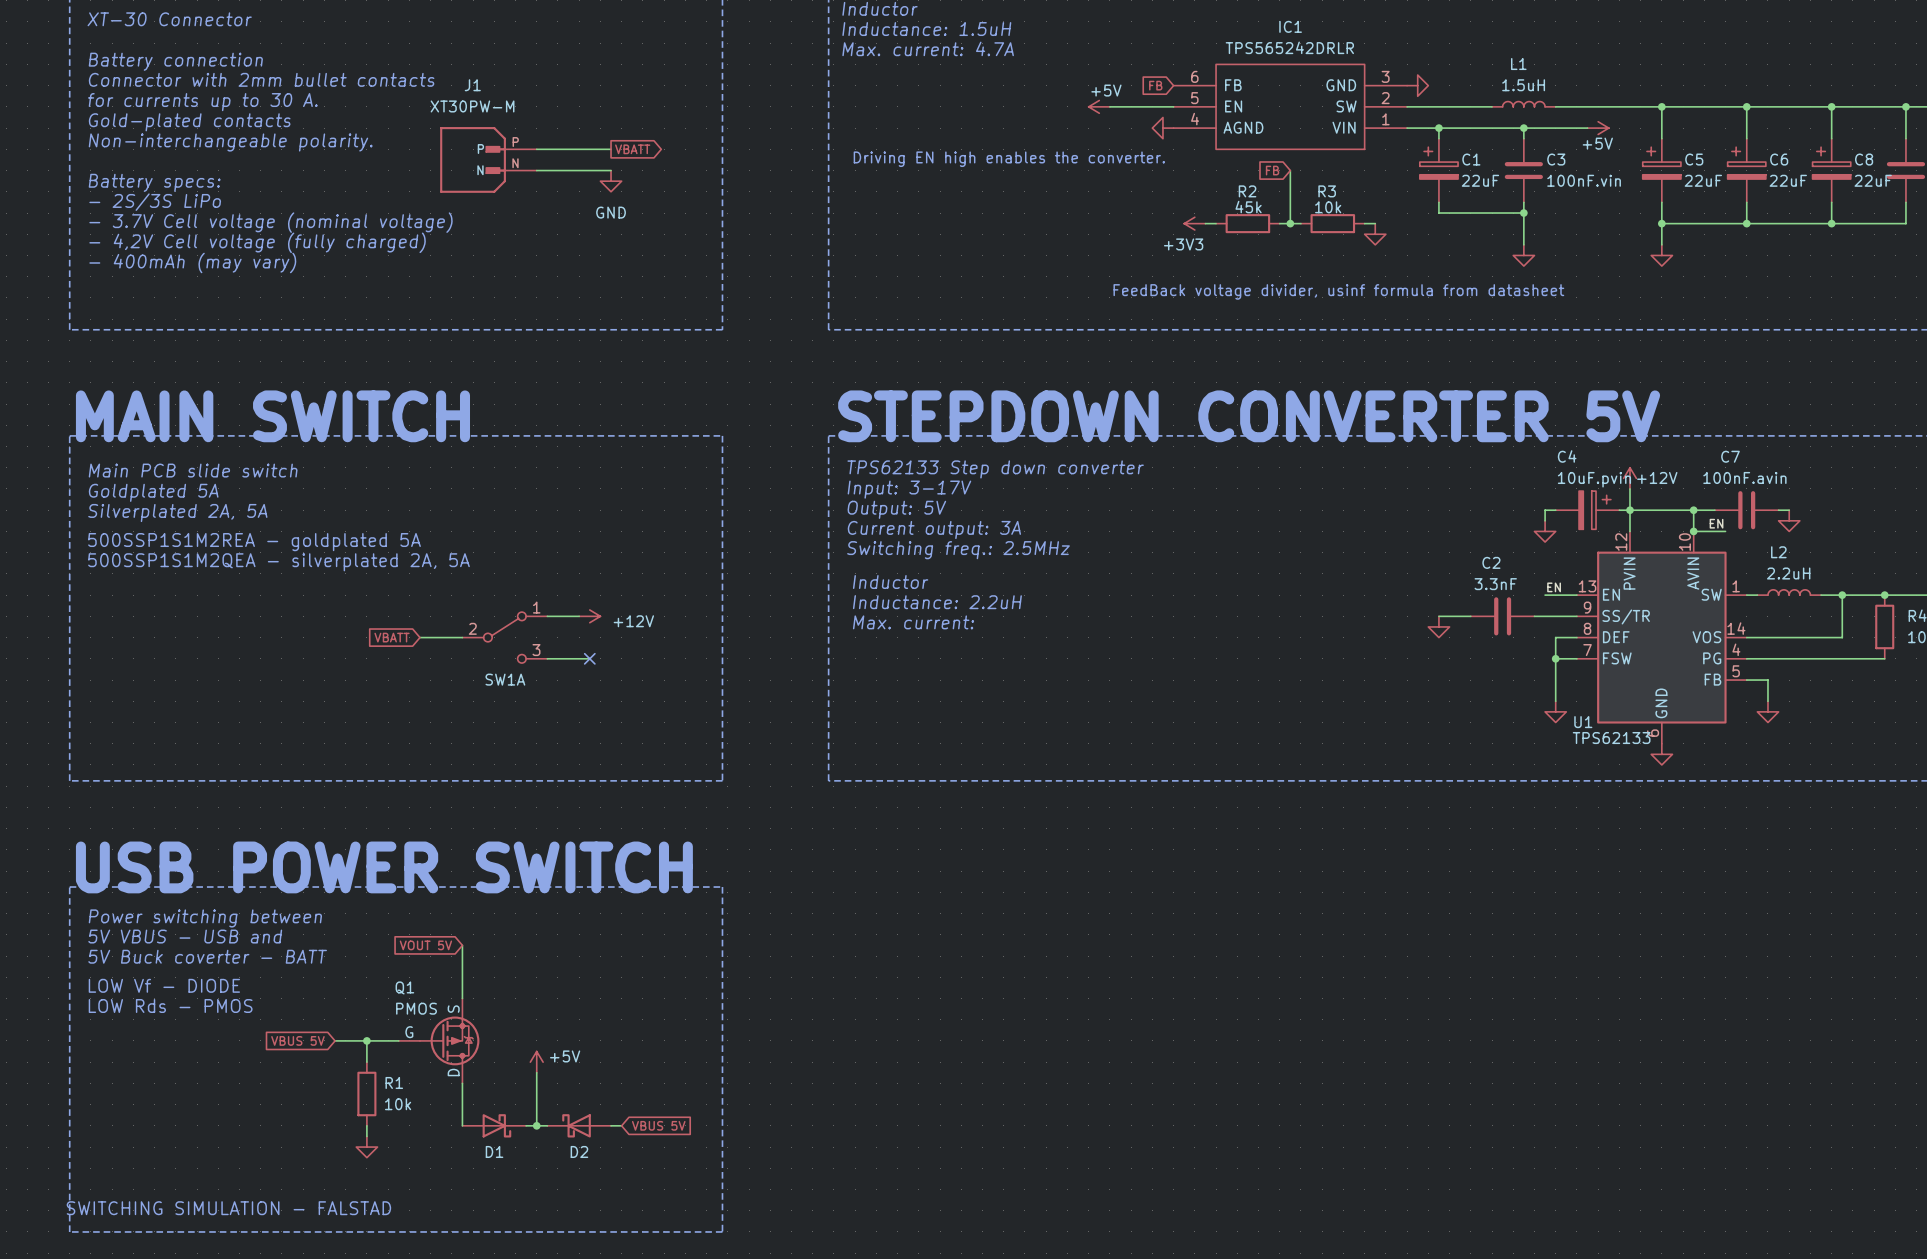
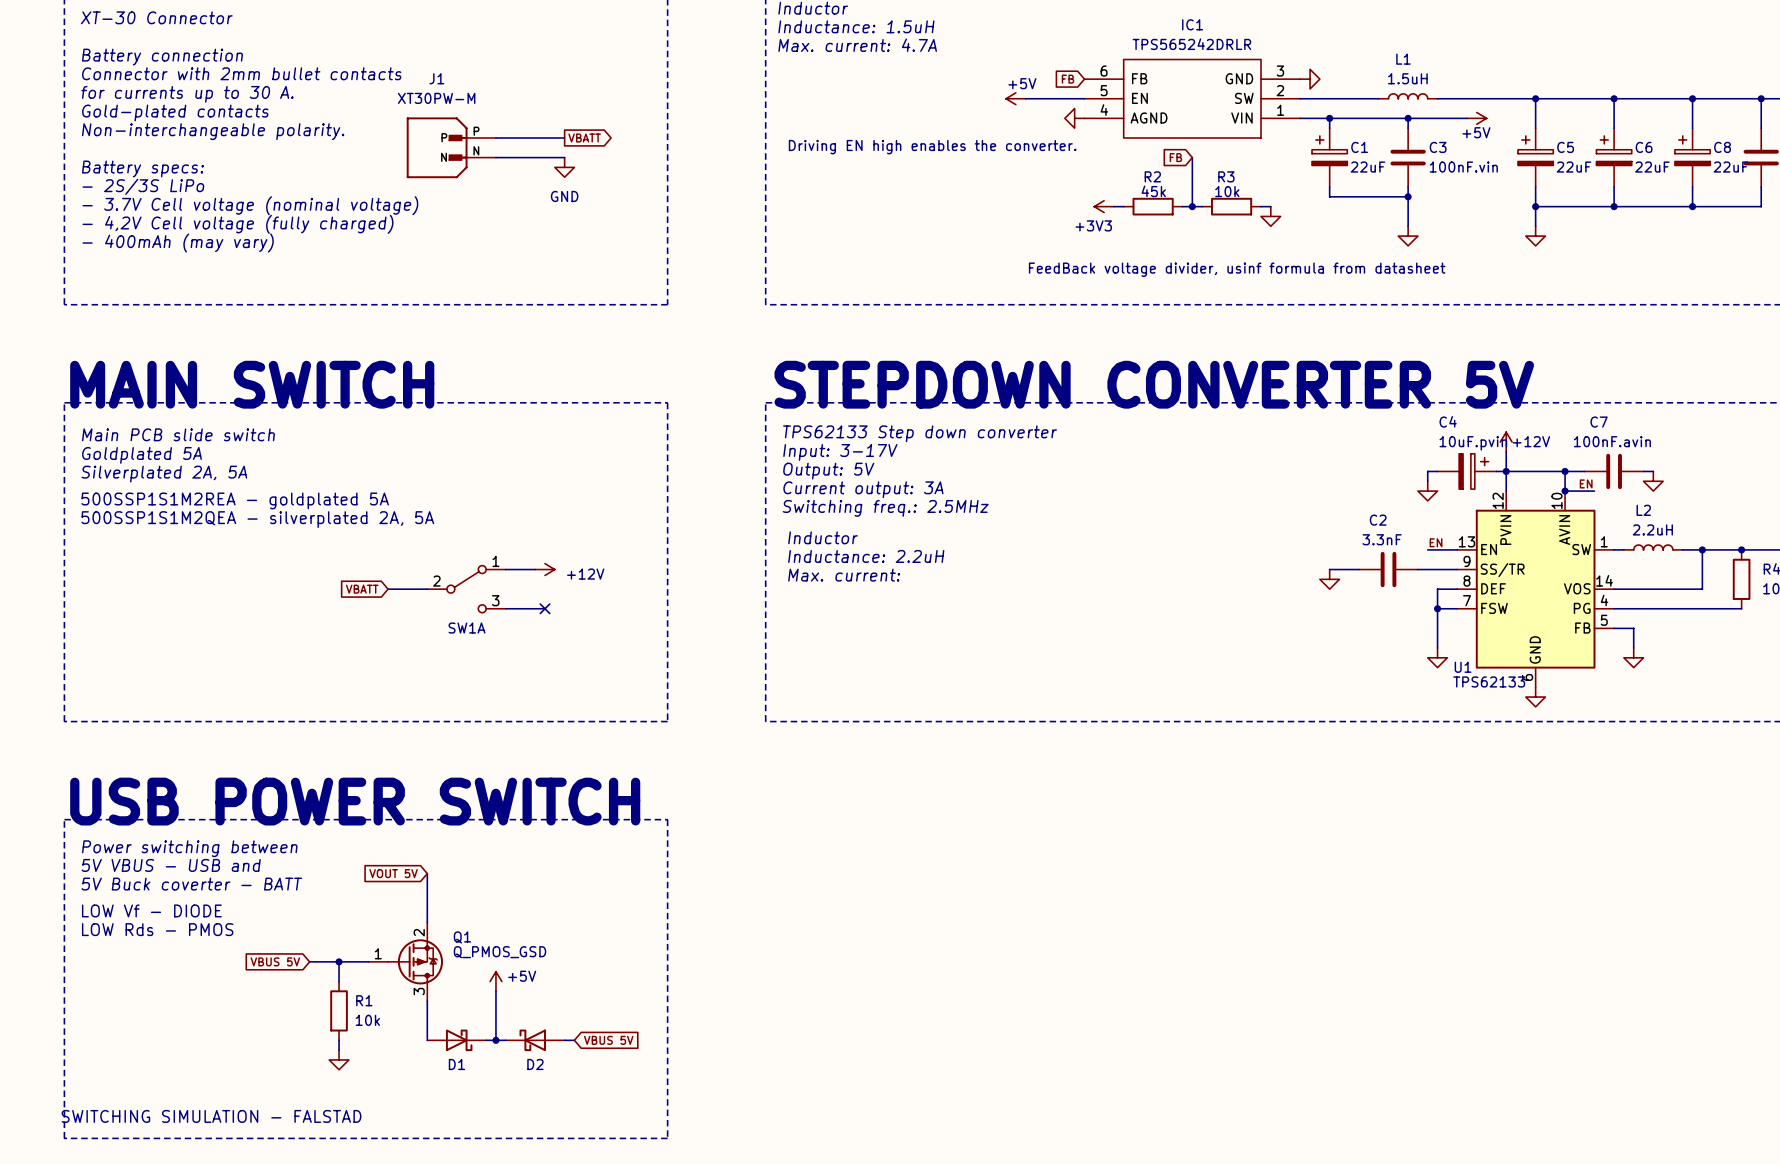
Q1 name position: Q1 (404, 987) -> Q1 (462, 937)
Q1 value: PMOS (416, 1008) -> Q_PMOS_GSD (500, 952)
Q1 pin name: S (453, 1009) -> none
Q1 pin number: none -> 2 (419, 932)
Q1 pin name: G (409, 1032) -> none
Q1 pin number: none -> 1 (378, 953)
Q1 pin name: D (453, 1072) -> none
Q1 pin number: none -> 3 (419, 991)

